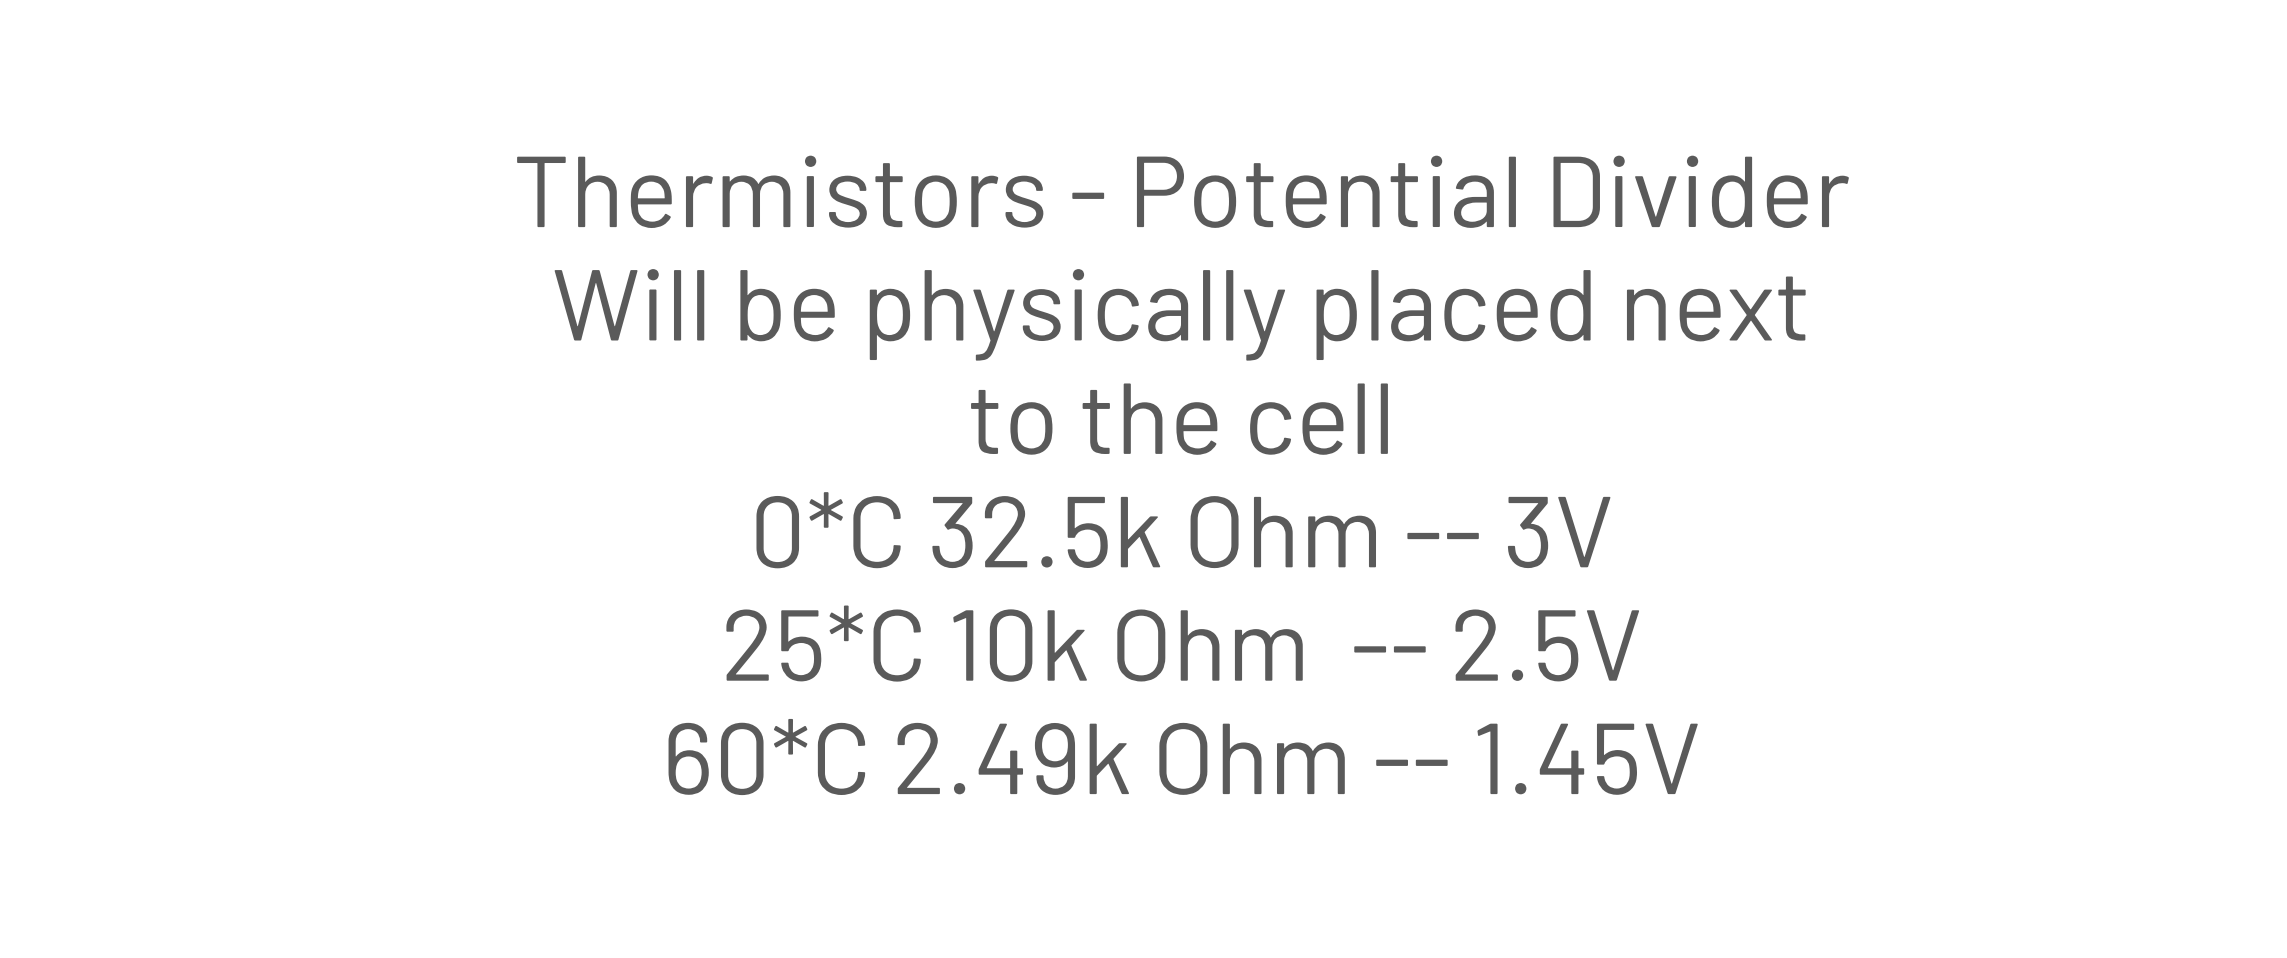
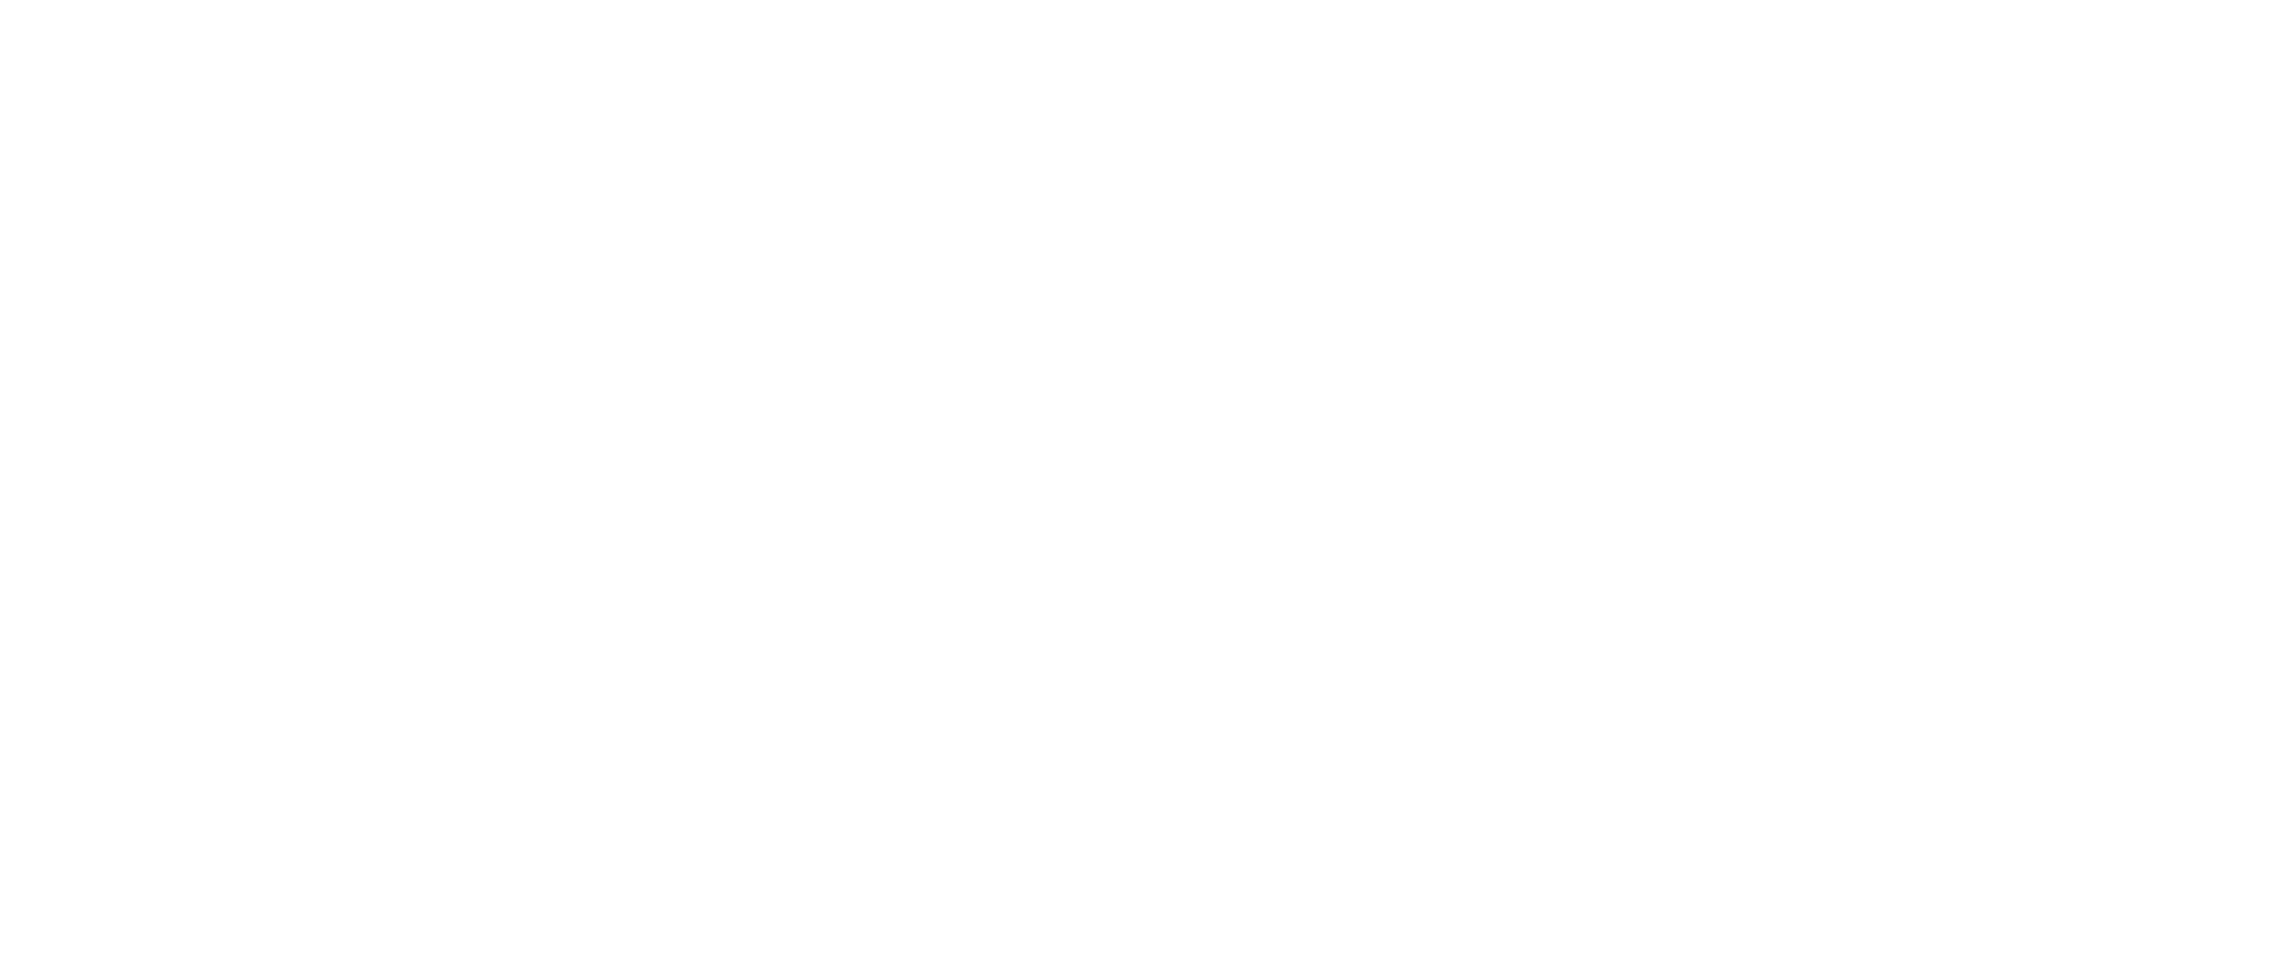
text: Thermistors - Potential Divider (1183, 191) -> none
text: Will be physically placed next (1180, 314) -> none
text: to the cell (1179, 419) -> none
text: 0*C 32.5k Ohm -- 3V (1183, 530) -> none
text: 25*C 10k Ohm -- 2.5V (1182, 643) -> none
text: 60*C 2.49k Ohm -- 1.45V (1183, 757) -> none

